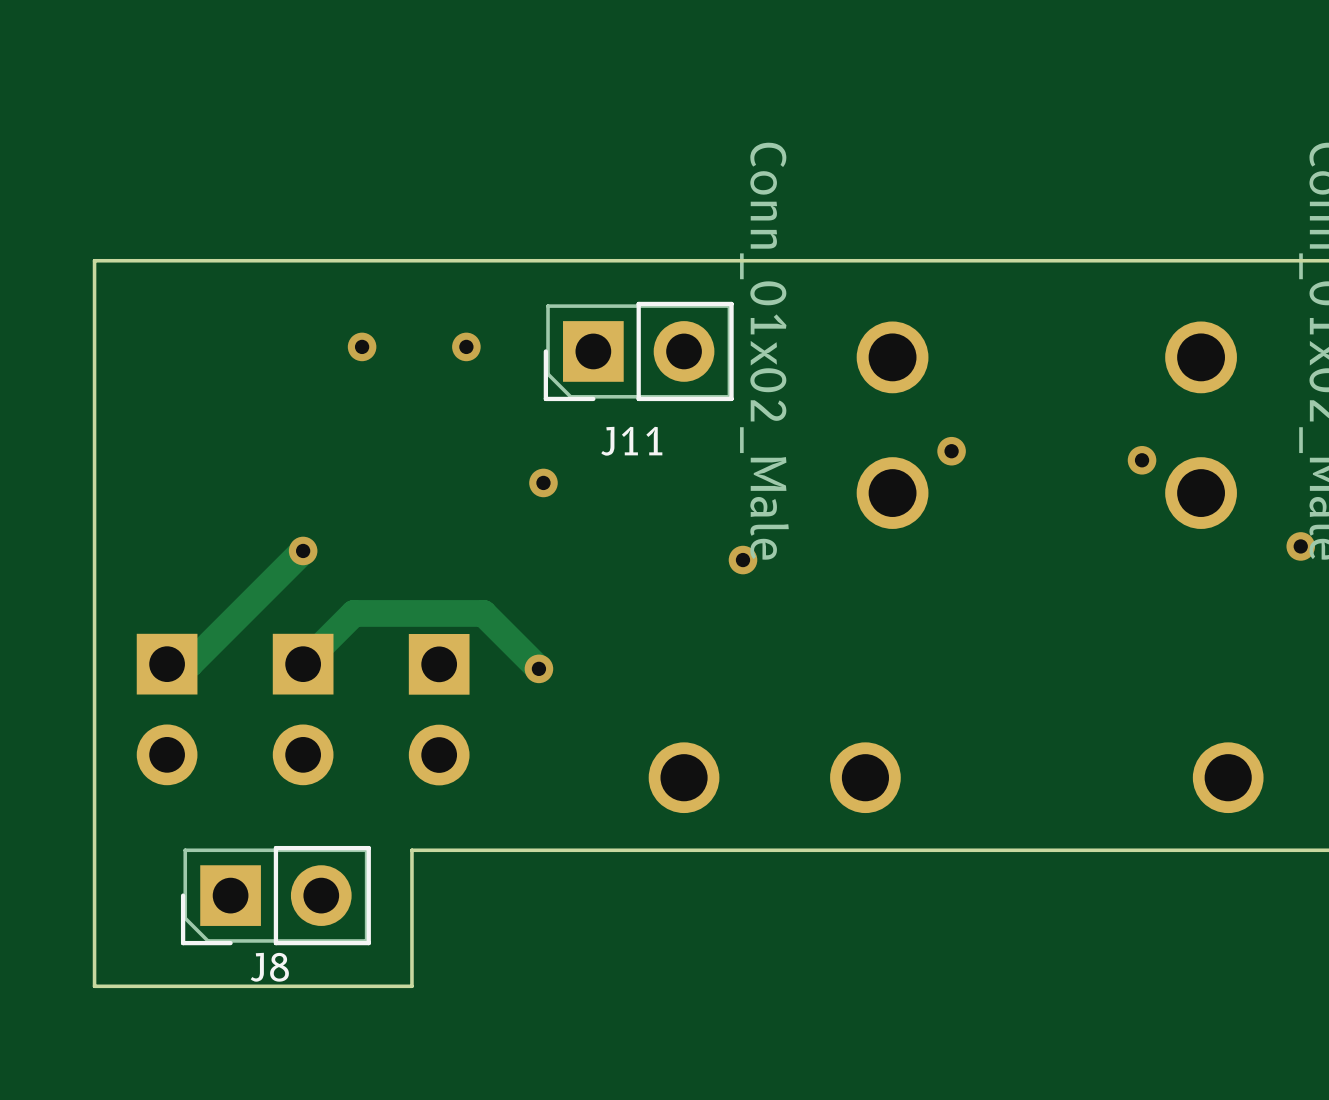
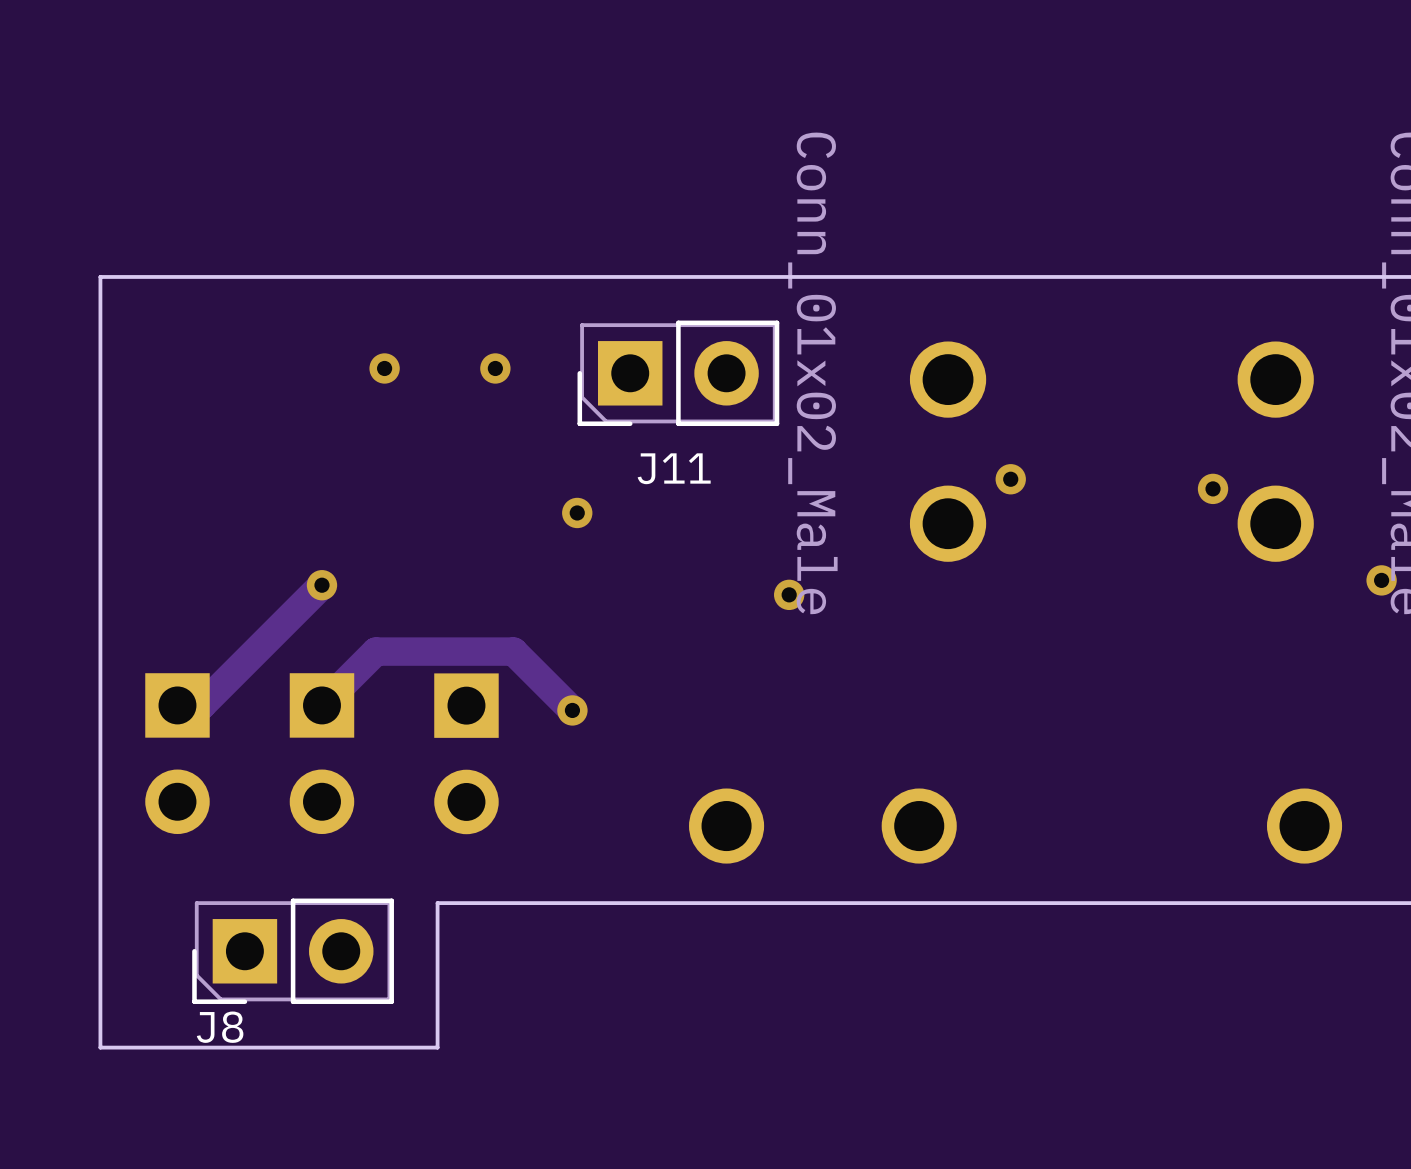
J8 name position: J8 (269, 967) -> J8 (220, 1027)

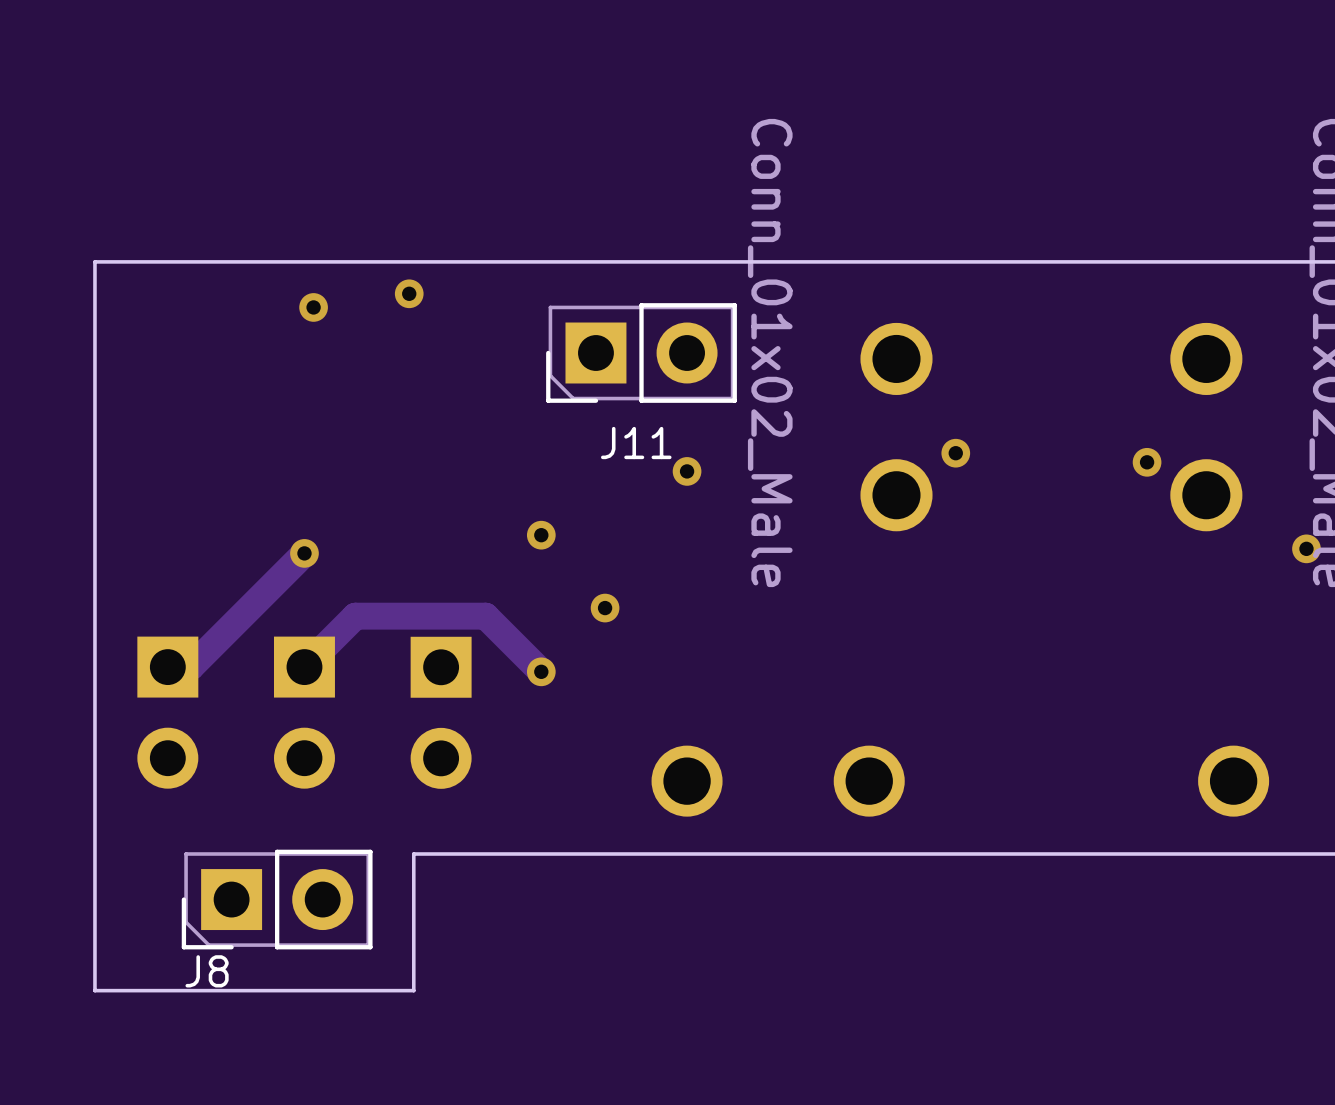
via: none -> (409, 293)
via: none -> (313, 307)
via: (384, 368) -> none
via: (495, 368) -> none
via: none -> (687, 471)
via position: (577, 512) -> (541, 535)
via: (789, 594) -> none
via: none -> (605, 608)

